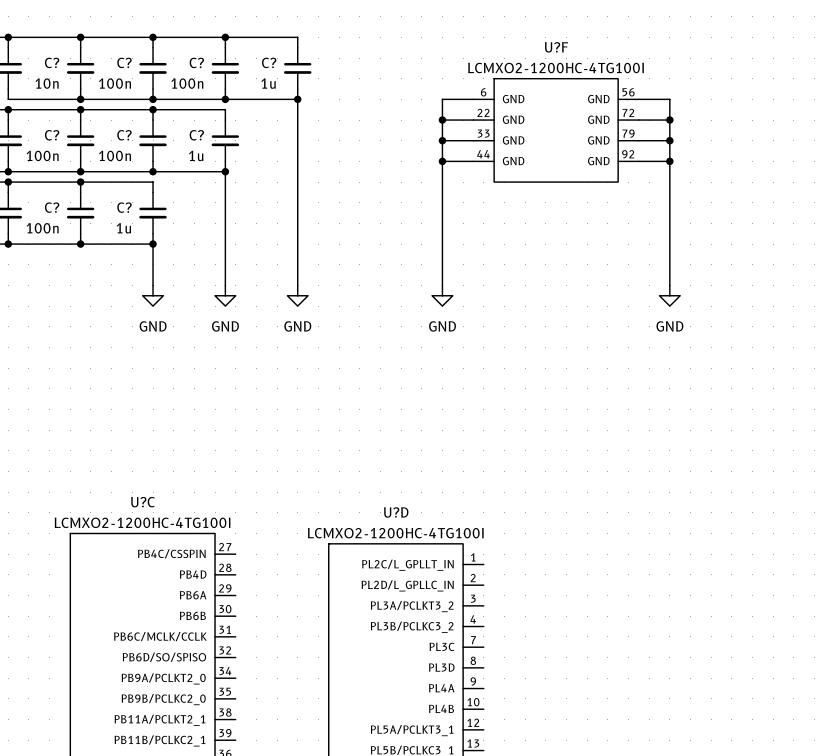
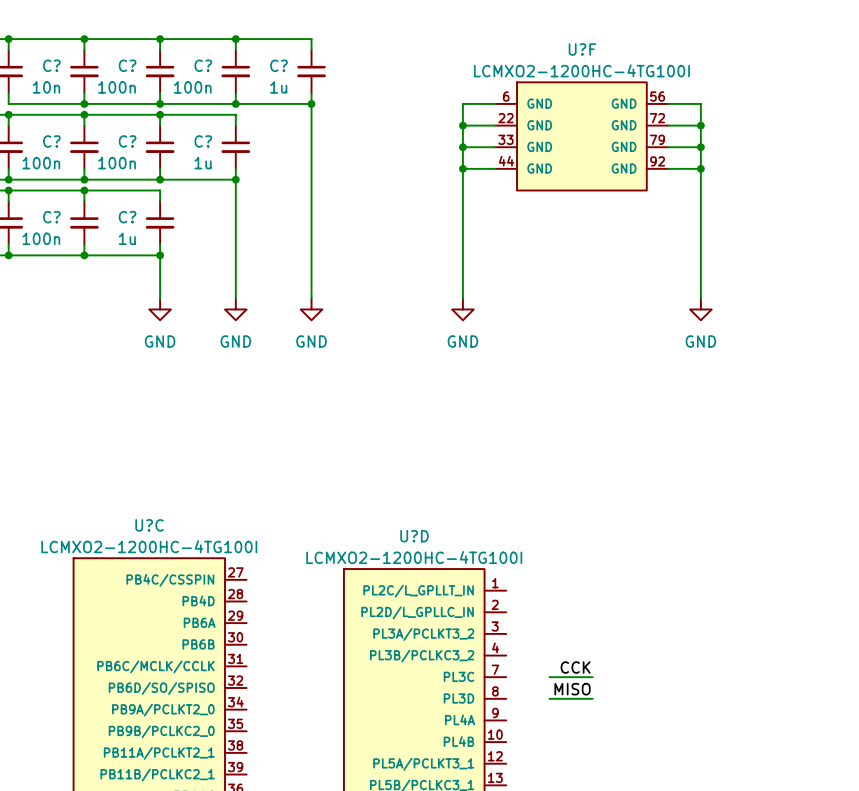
label: none -> CCK (575, 667)
wire: none -> (549, 677) (592, 677)
label: none -> MISO (572, 689)
wire: none -> (549, 698) (592, 698)

